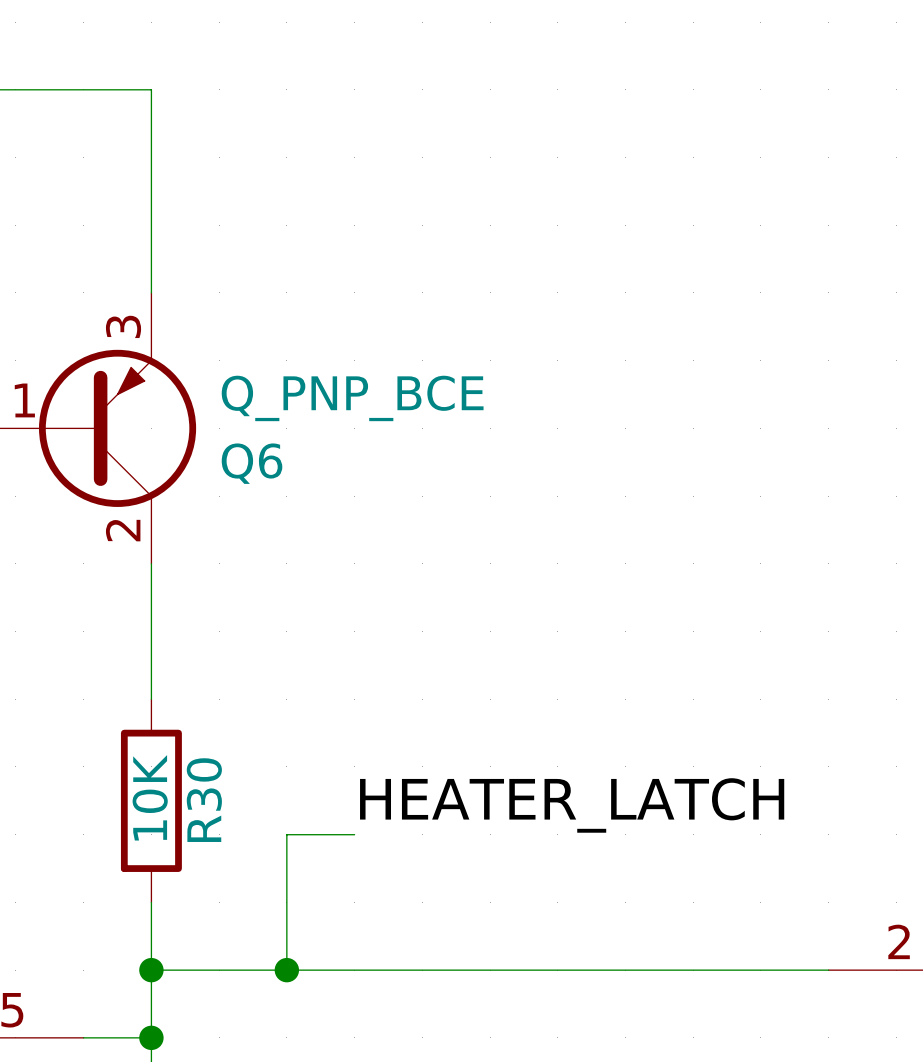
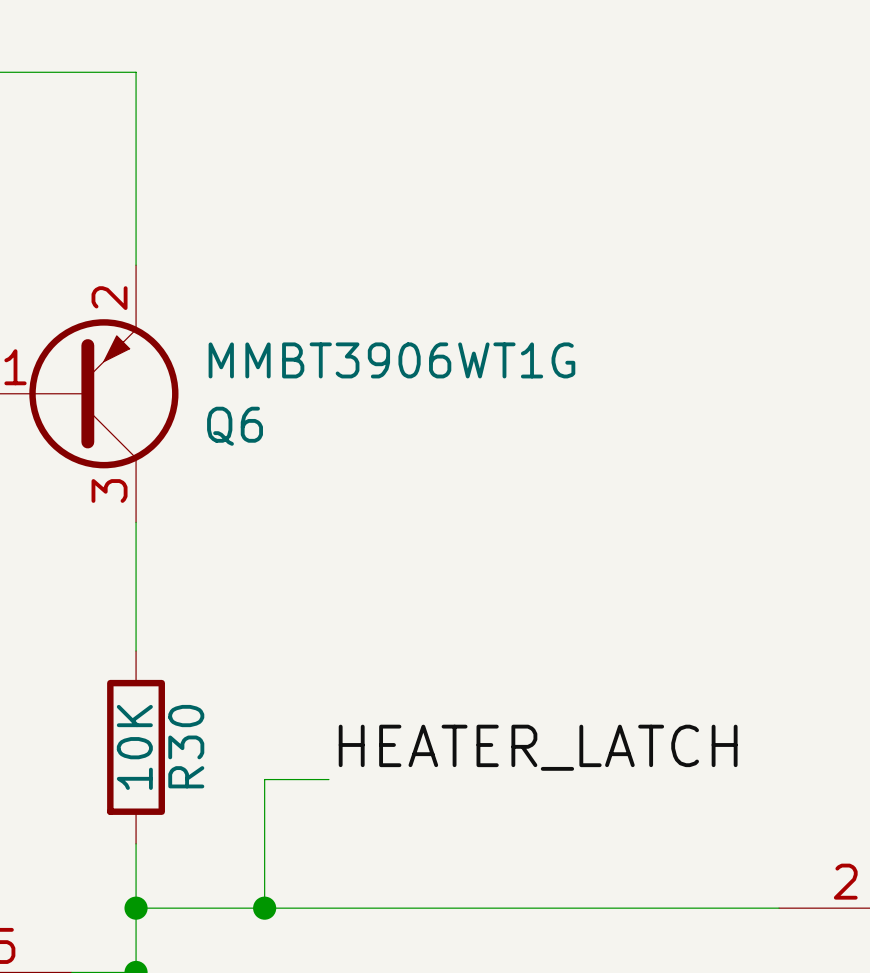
Q6 pin number: 3 (123, 326) -> 2 (109, 298)
Q6 value: Q_PNP_BCE (352, 398) -> MMBT3906WT1G (391, 360)
Q6 pin number: 2 (123, 530) -> 3 (109, 490)

